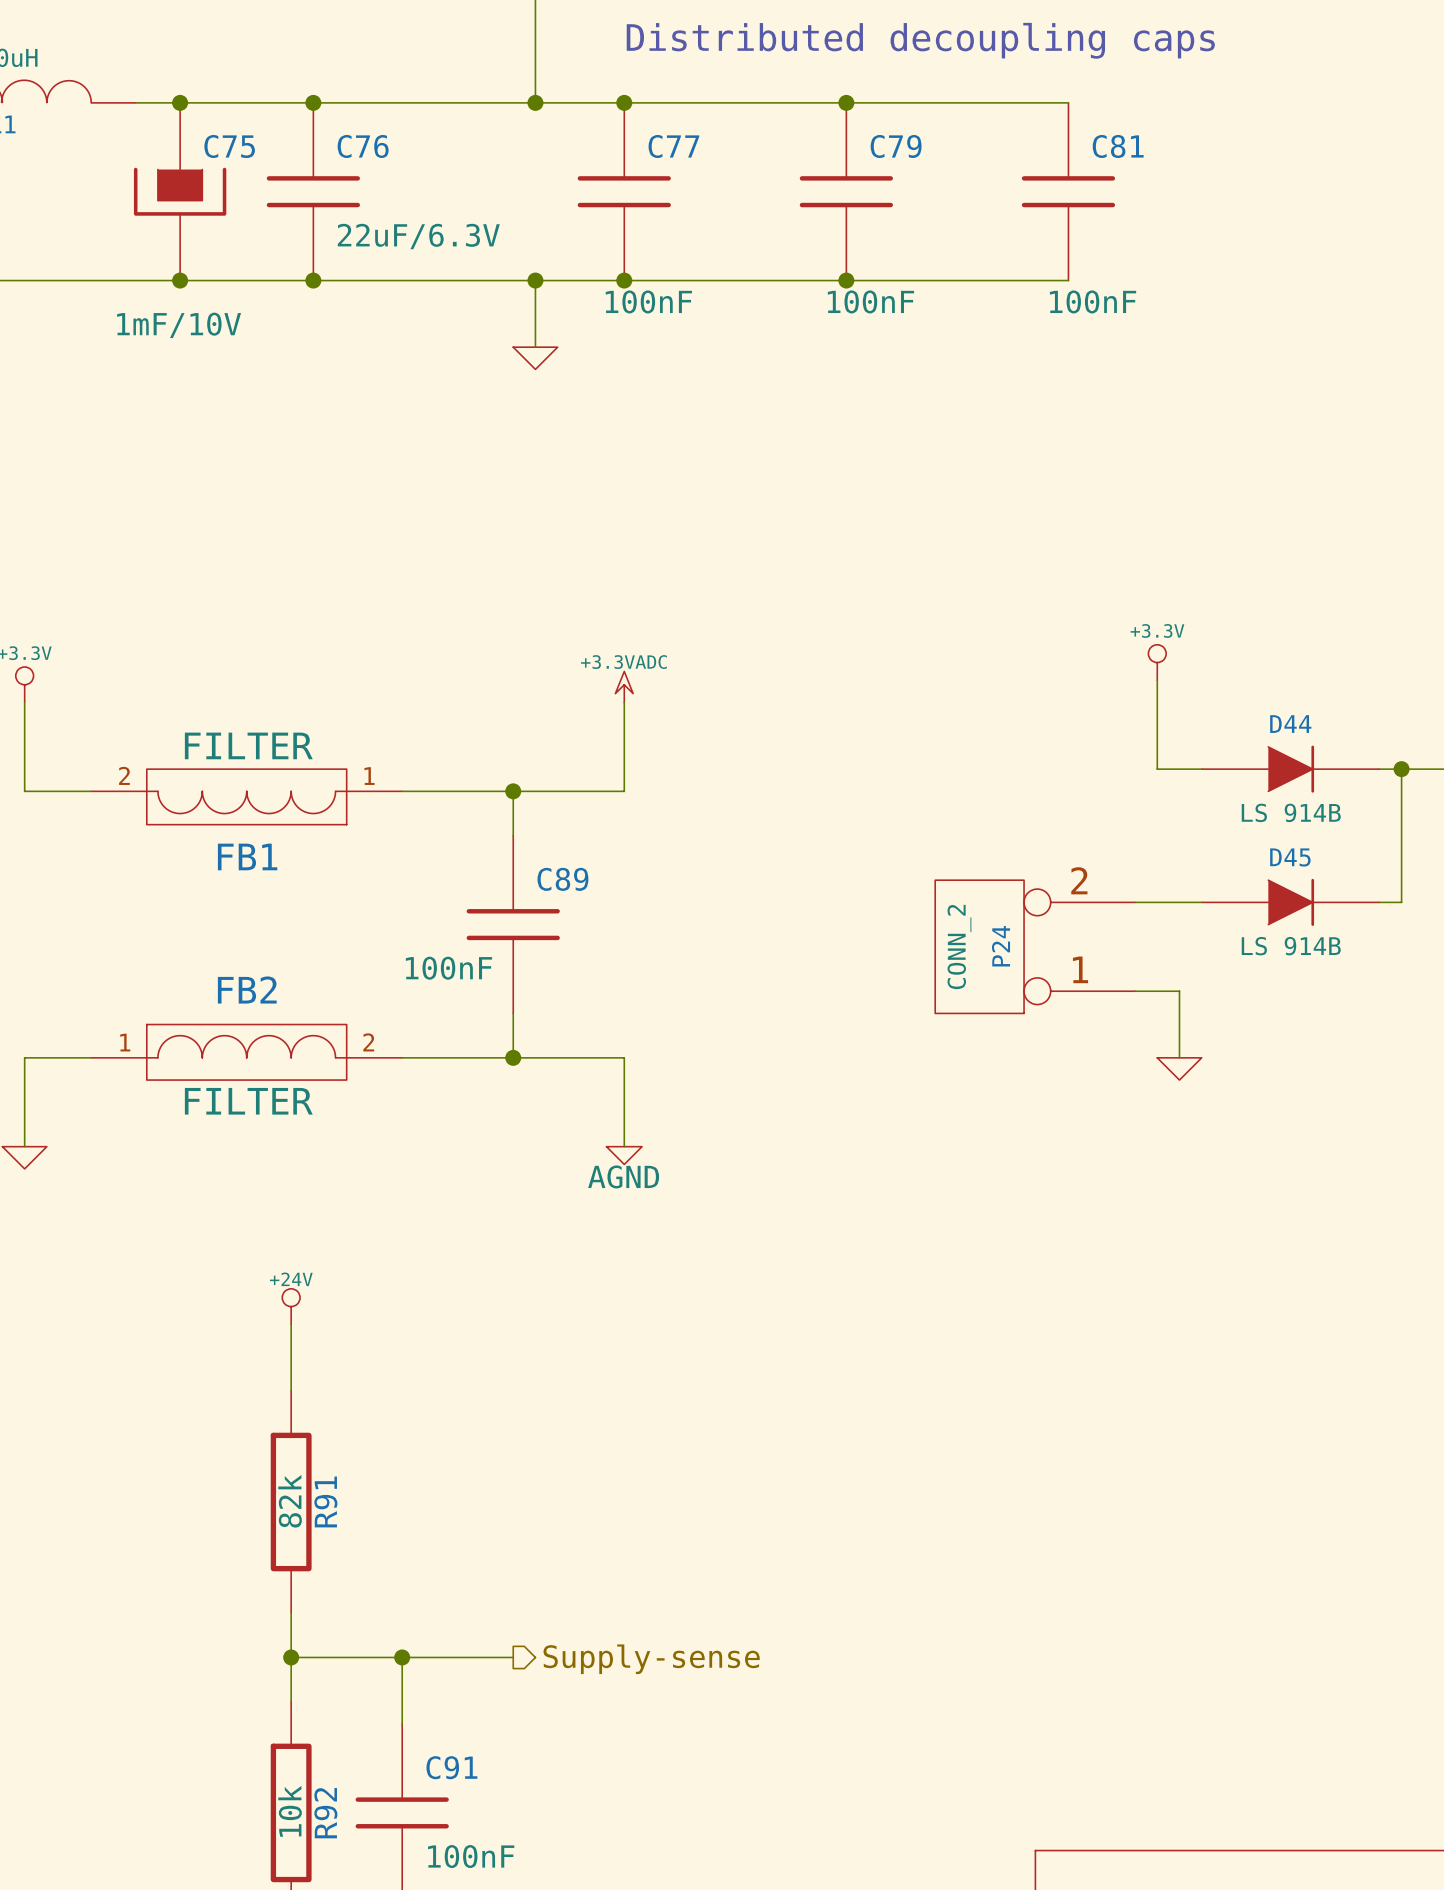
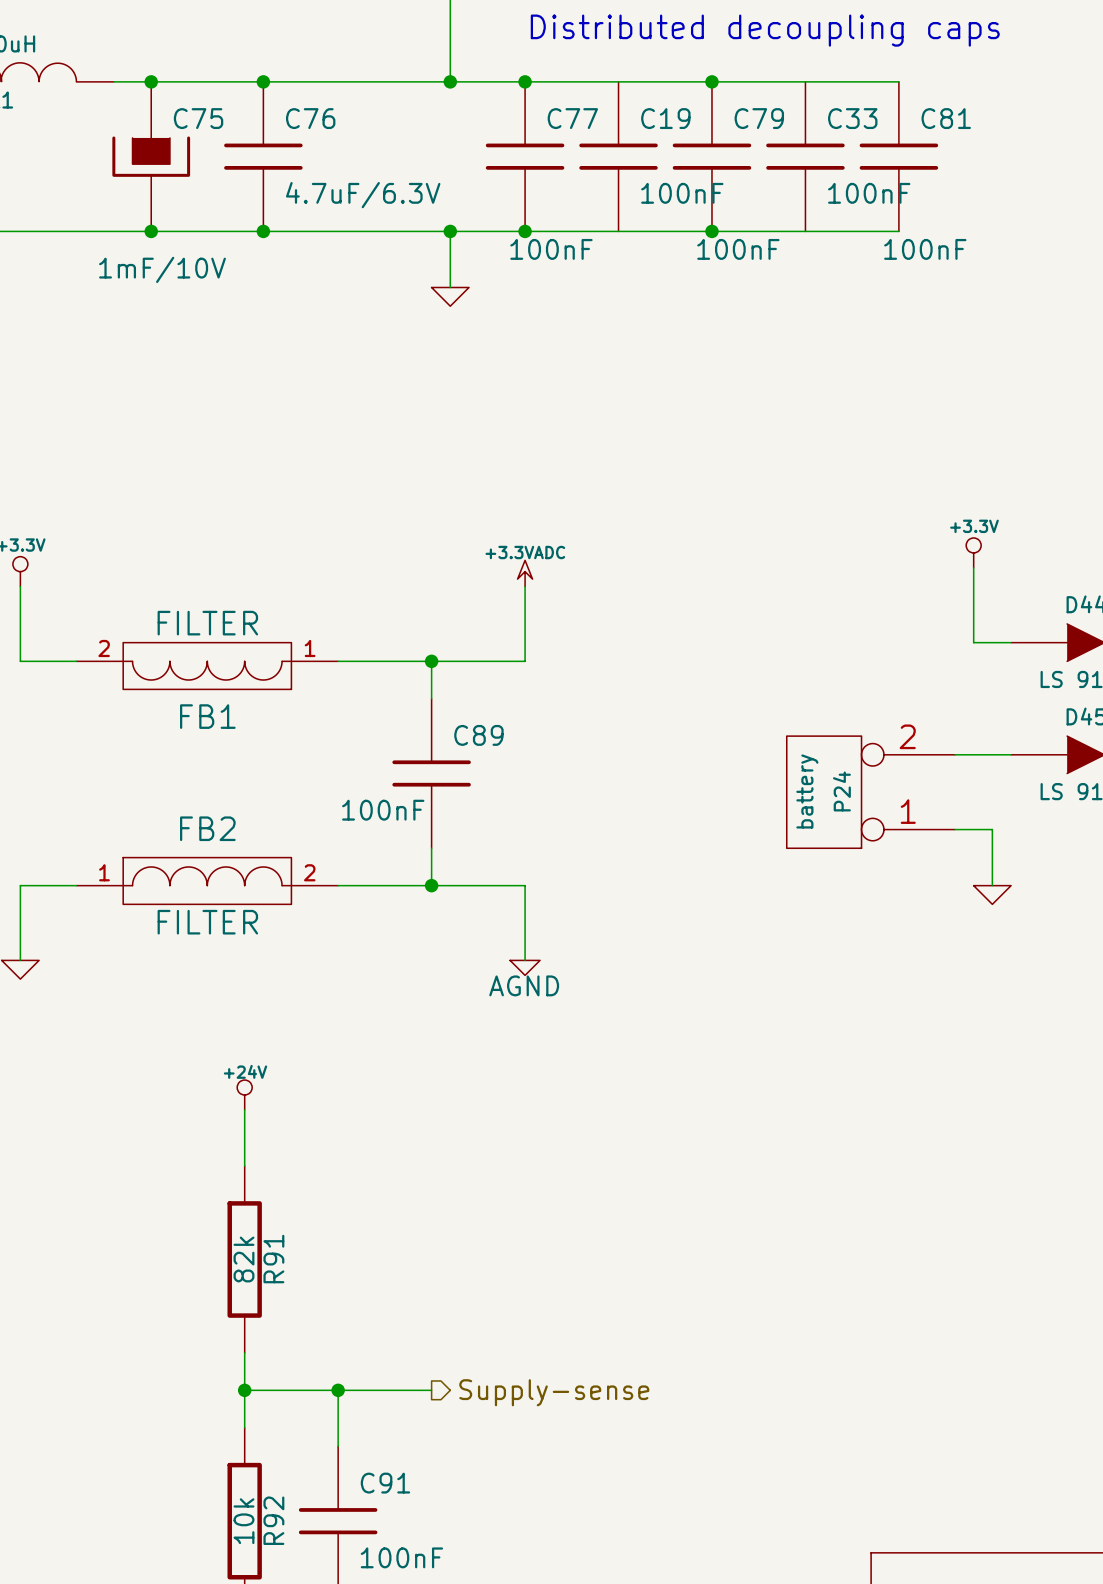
C19: none -> 100nF (618, 156)
C33: none -> 100nF (805, 156)
C76 value: 22uF/6.3V (418, 236) -> 4.7uF/6.3V (363, 195)
P24 value: CONN_2 (959, 947) -> battery (807, 791)

